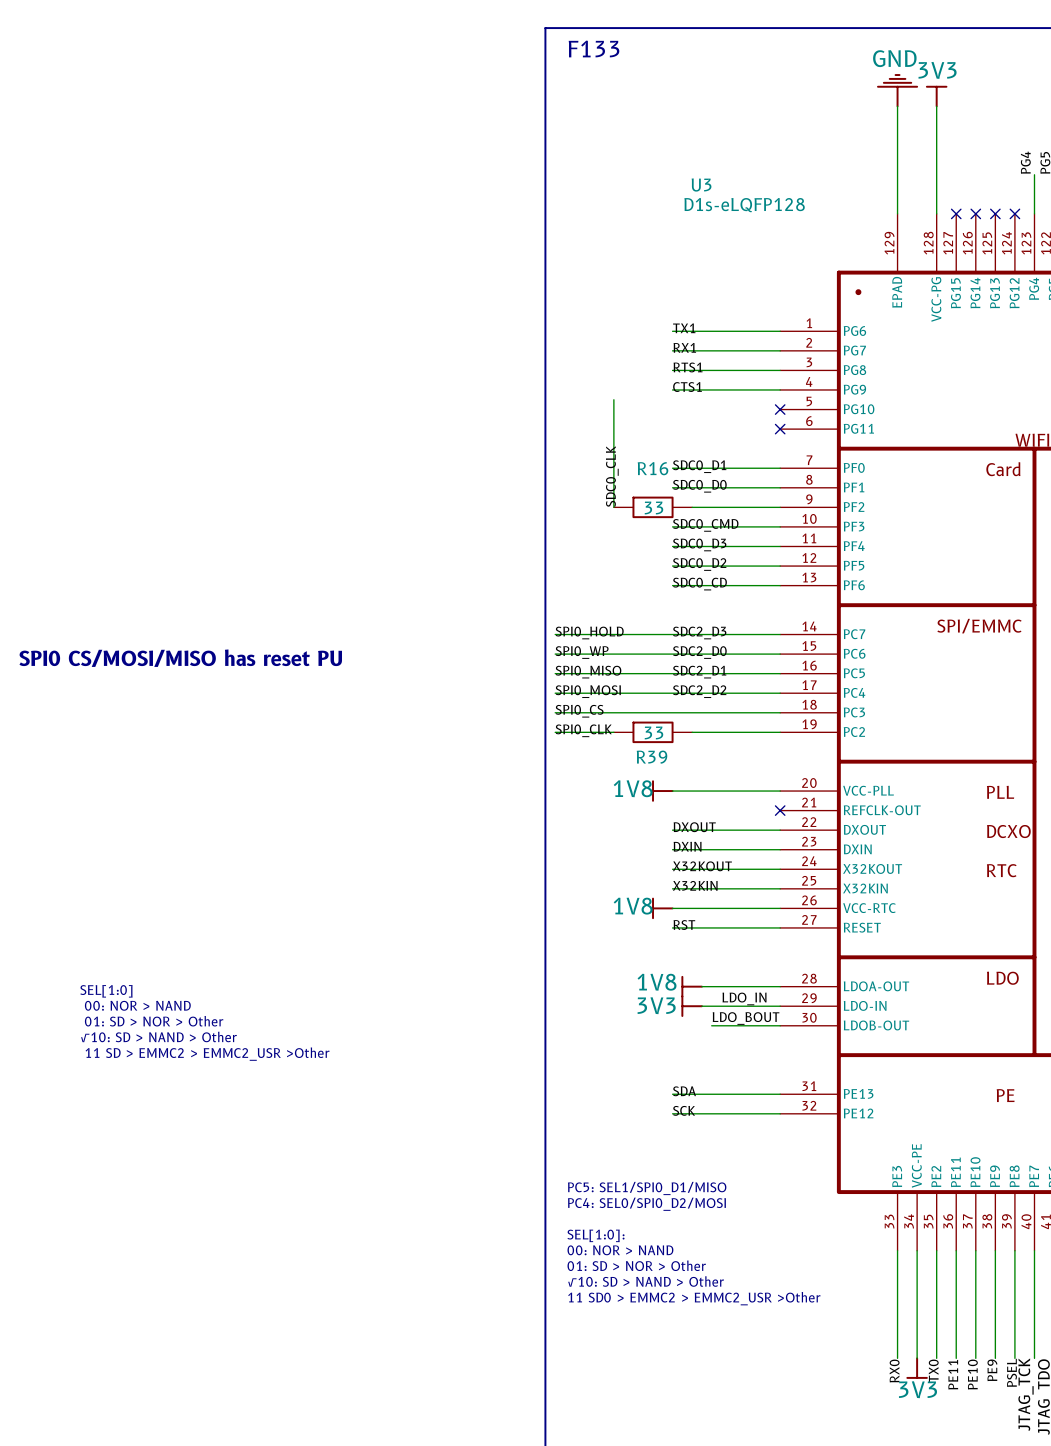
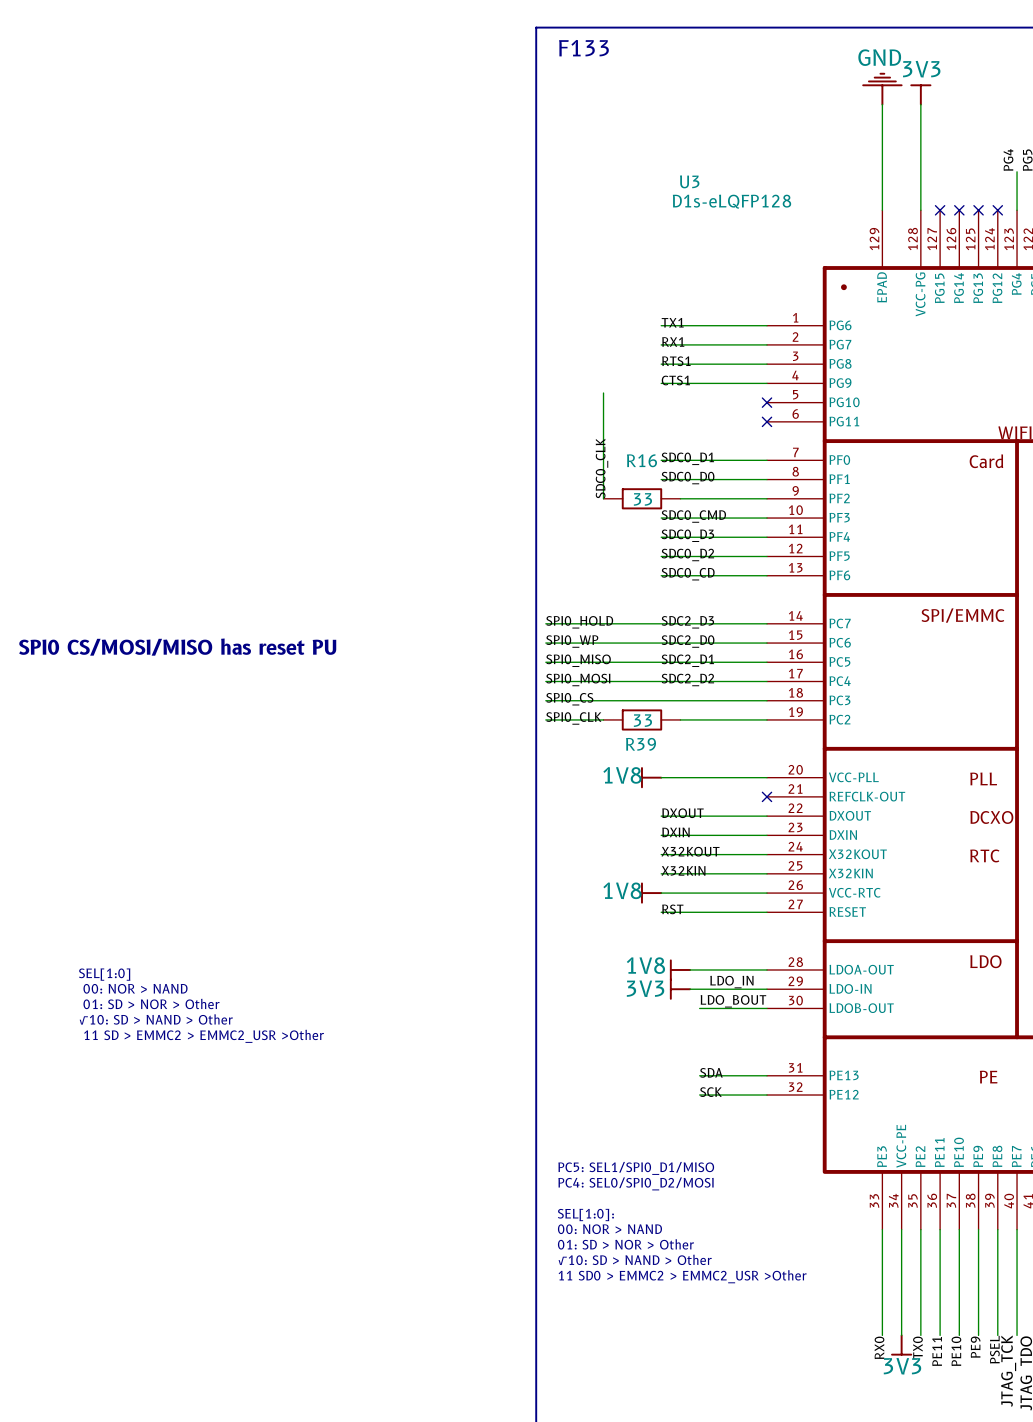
label position: SDA (684, 1091) -> SDA (711, 1072)
wire: (672, 1094) (711, 1094) -> none
label position: SCK (684, 1110) -> SCK (710, 1092)
wire: (672, 1113) (711, 1113) -> none

